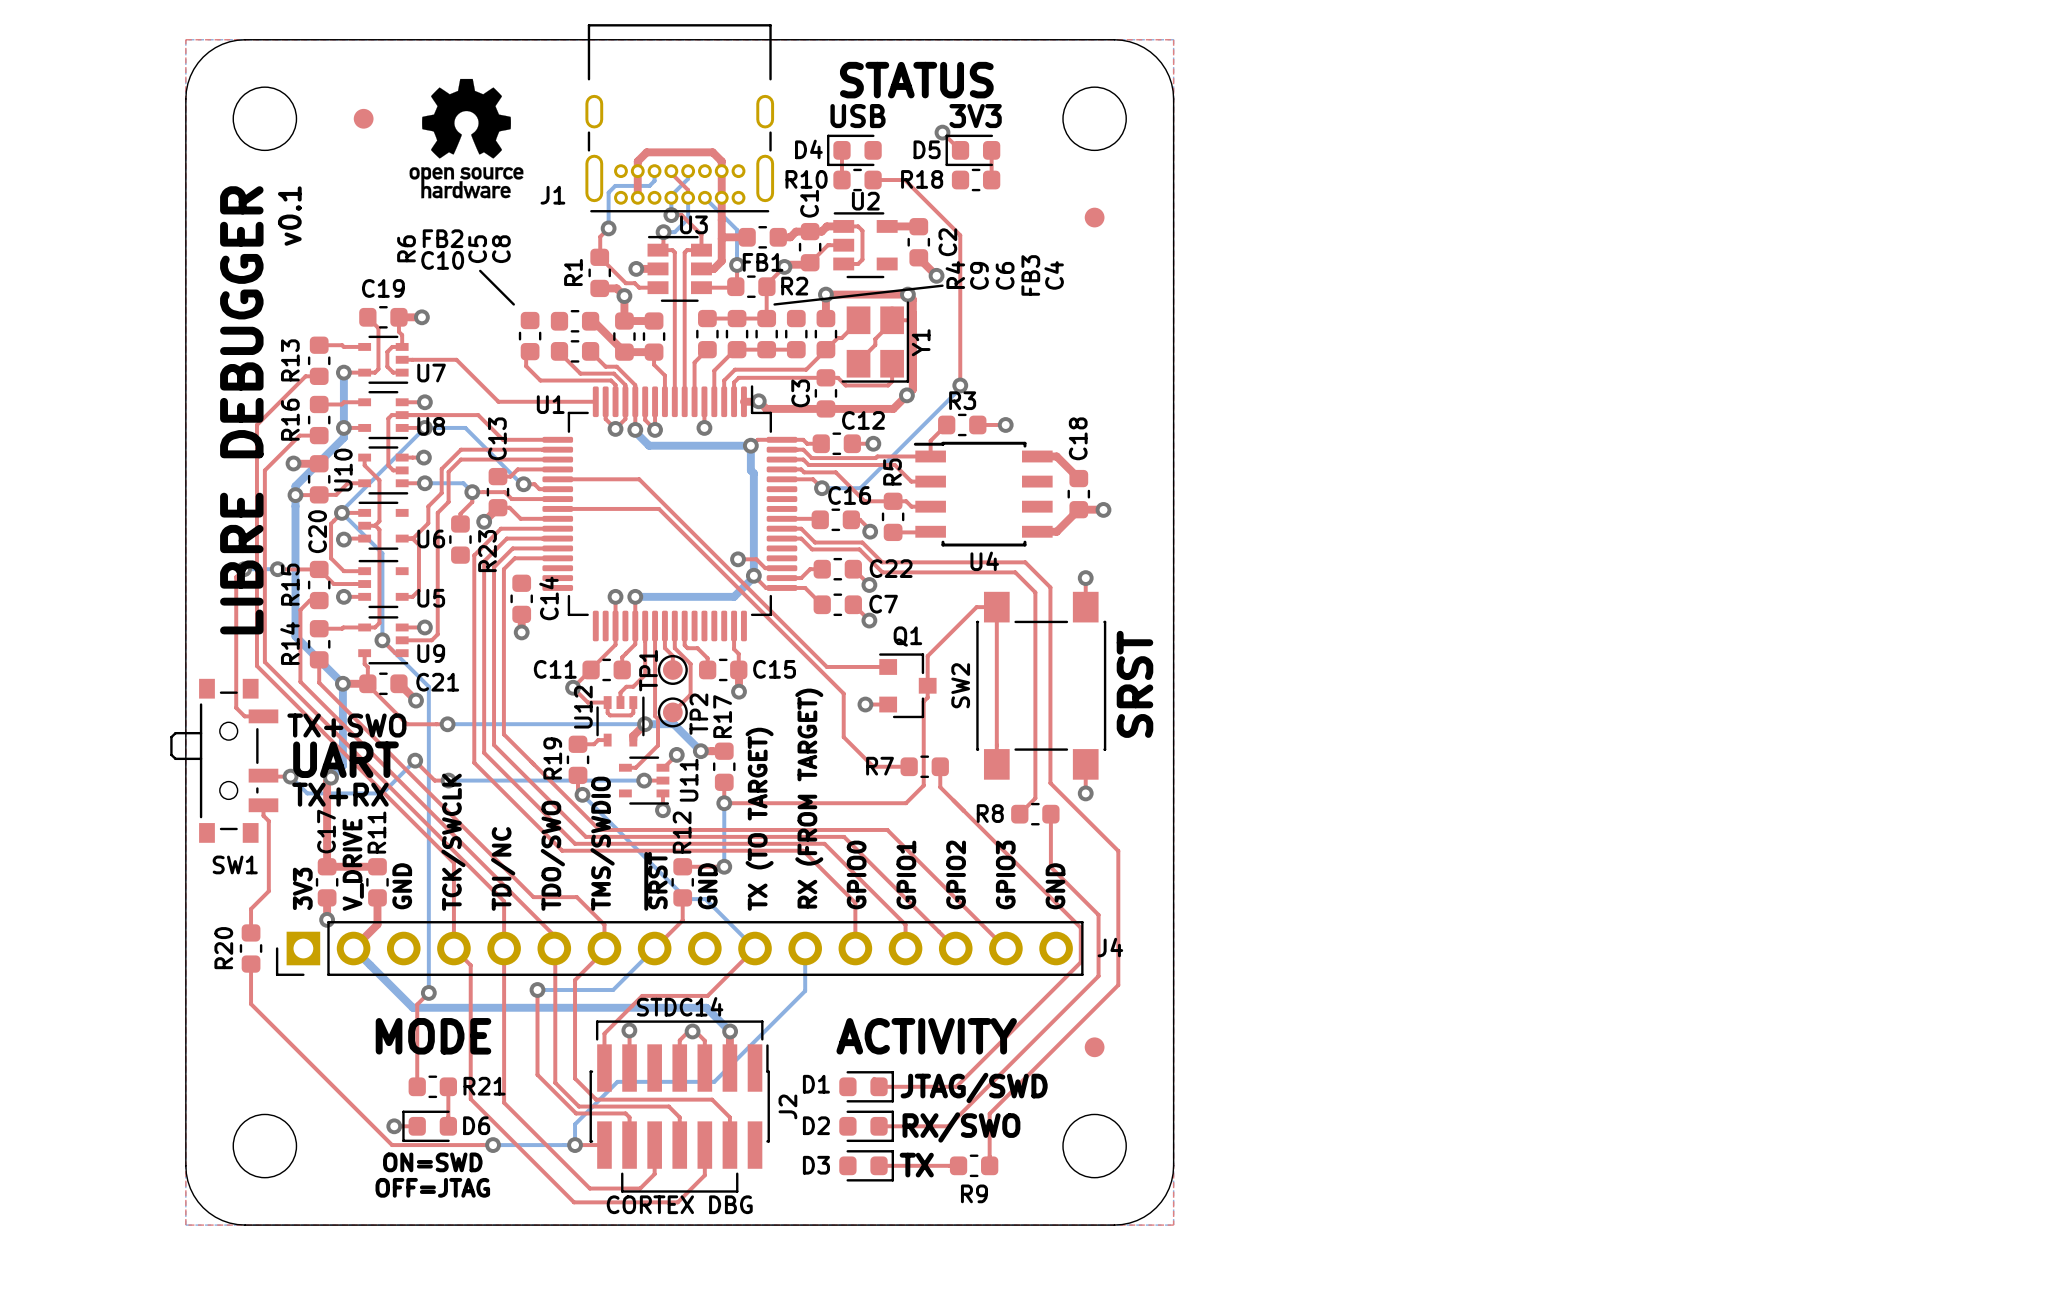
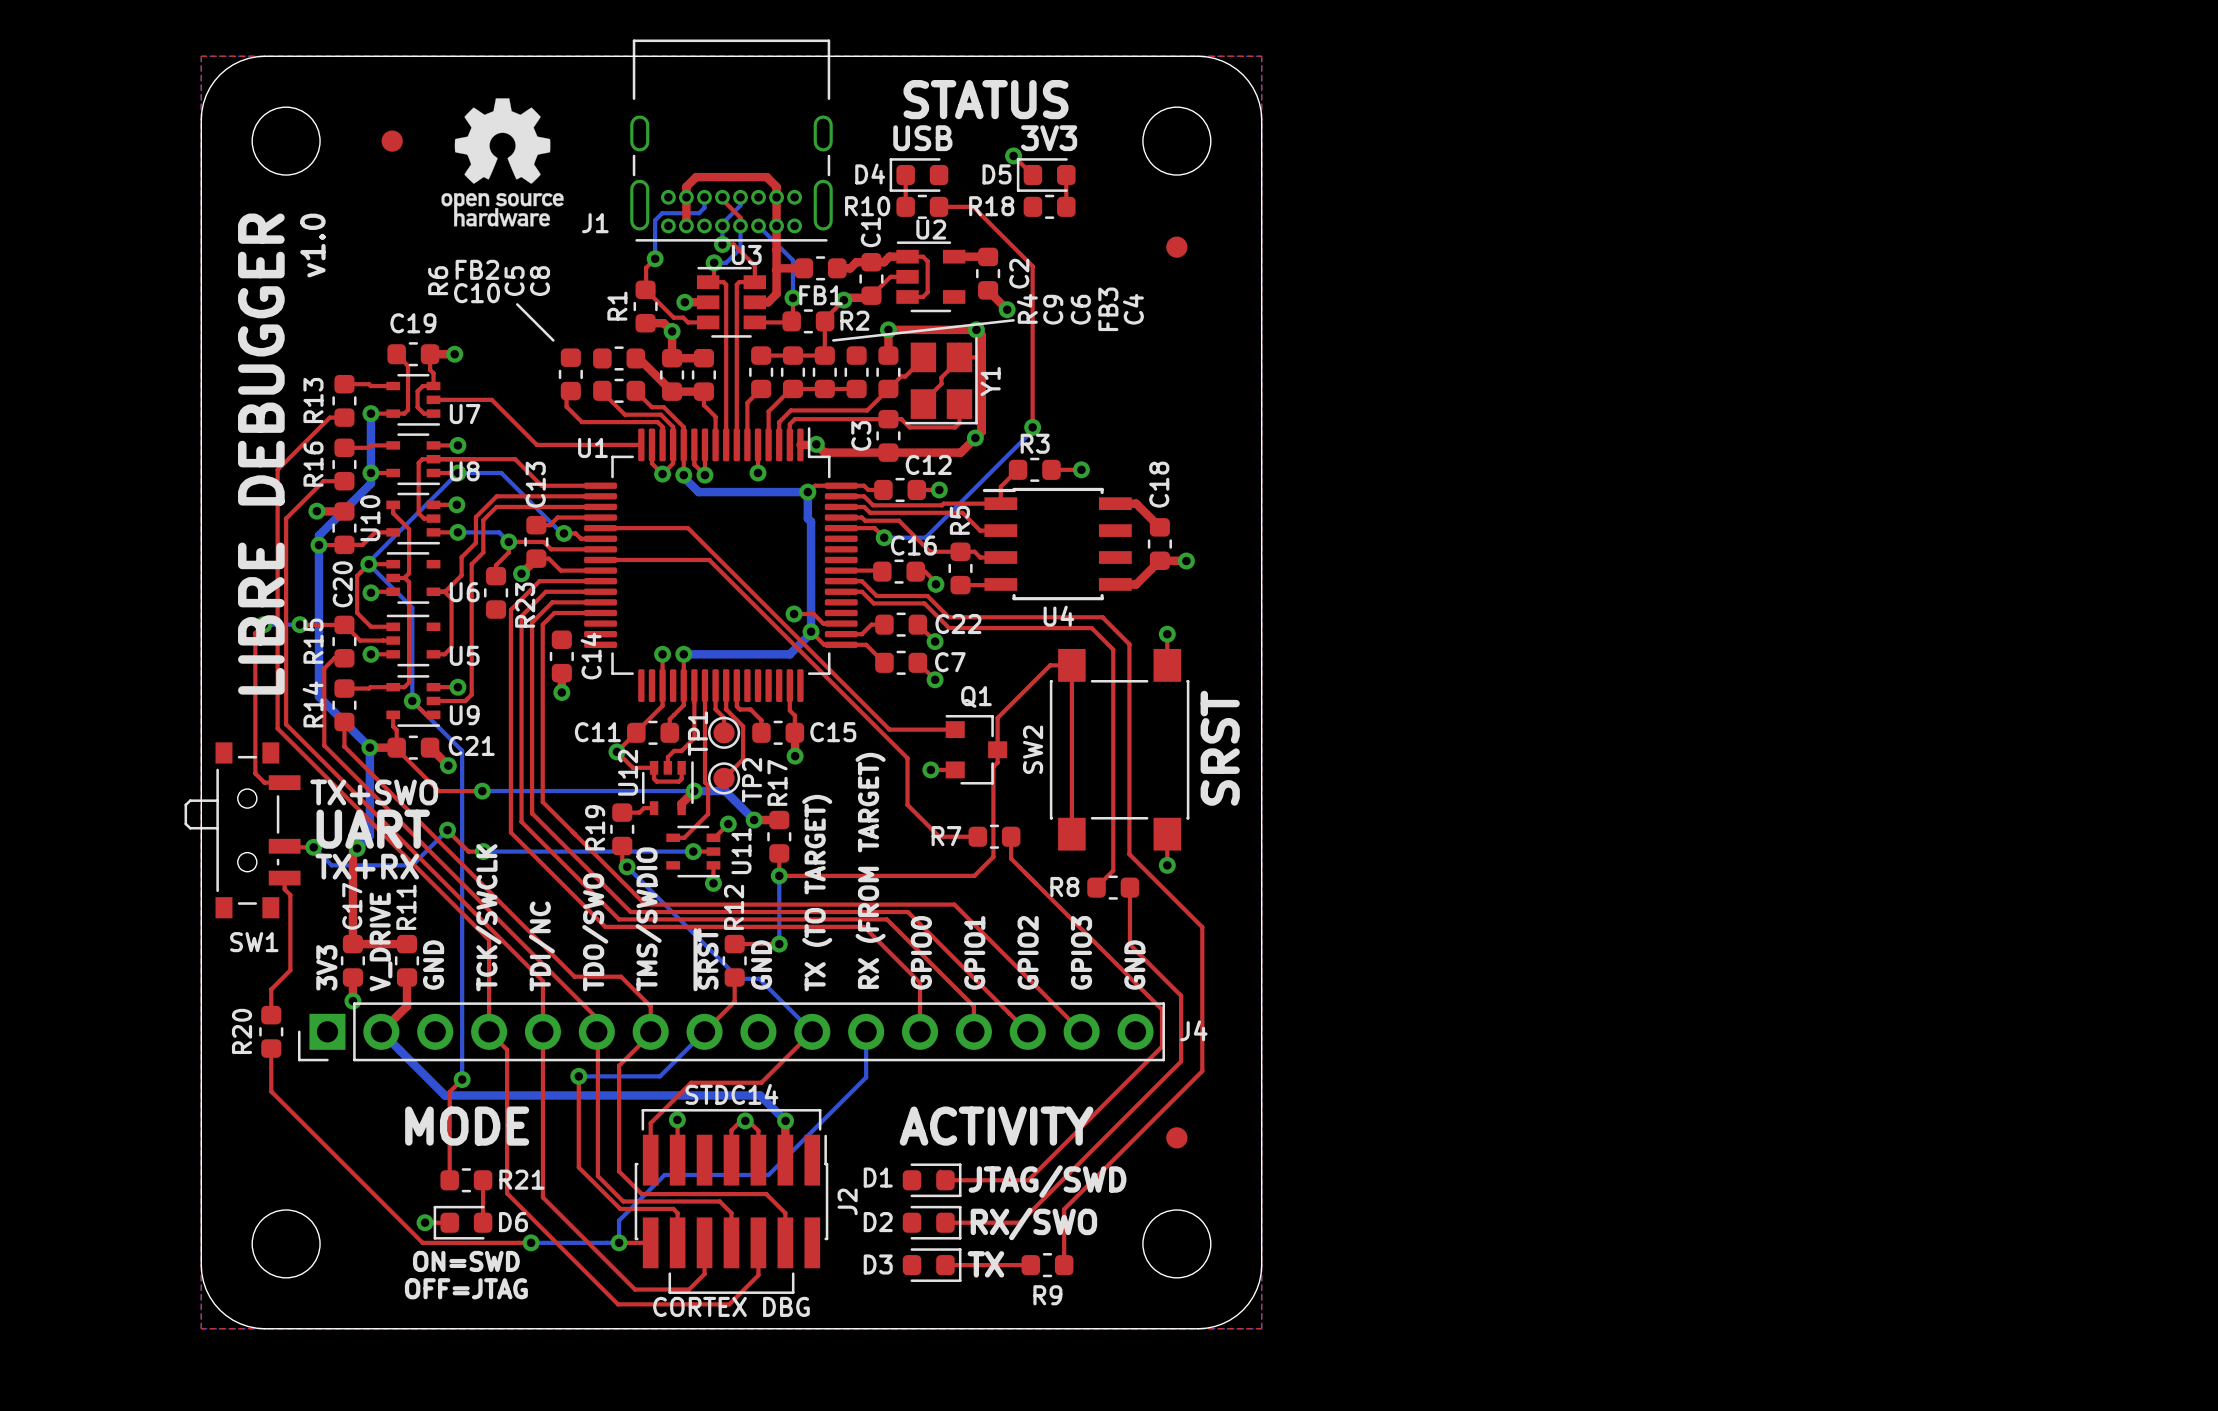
text: v0.1 (289, 216) -> v1.0 (312, 245)

